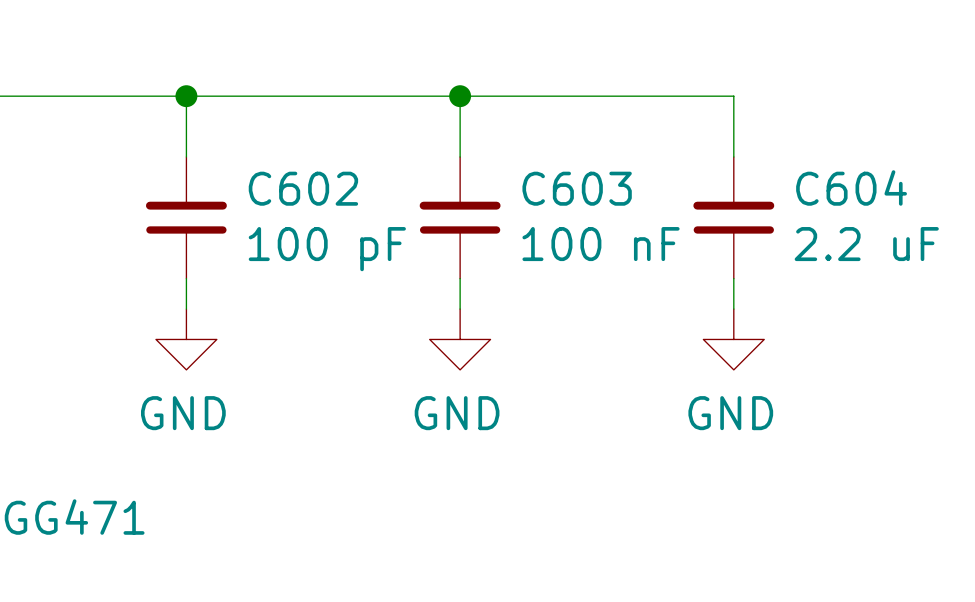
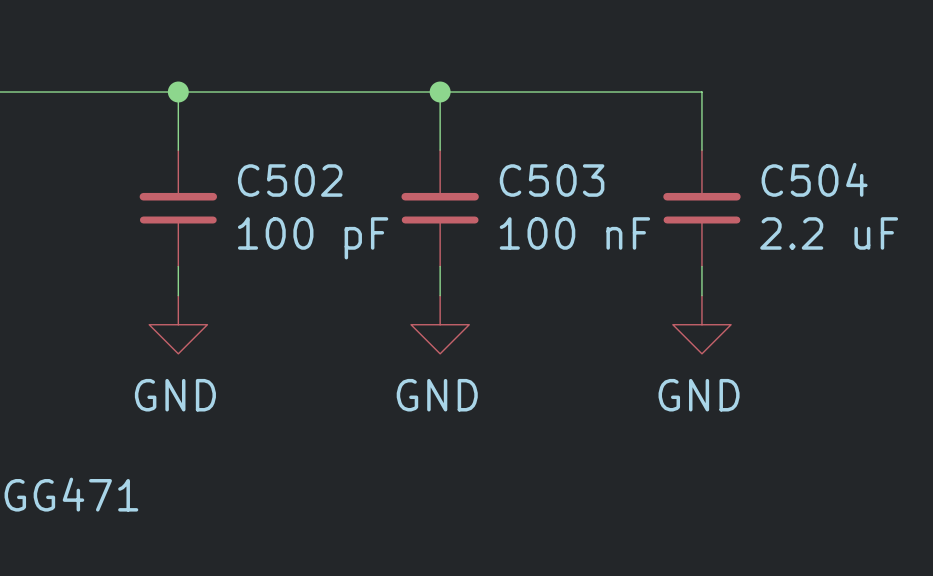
C604 name: C604 (851, 187) -> C504 (814, 179)
C602 name: C602 (303, 188) -> C502 (290, 180)
C603 name: C603 (577, 188) -> C503 (552, 180)

